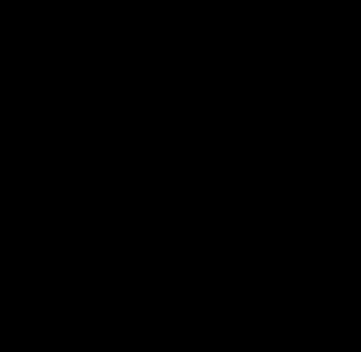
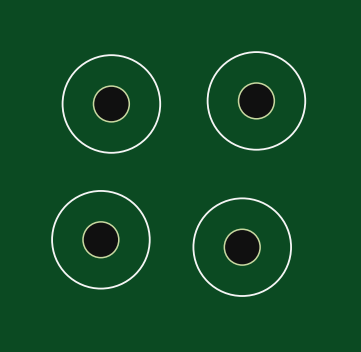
part: none -> (256, 100)
part: none -> (111, 103)
part: none -> (100, 239)
part: none -> (242, 247)

